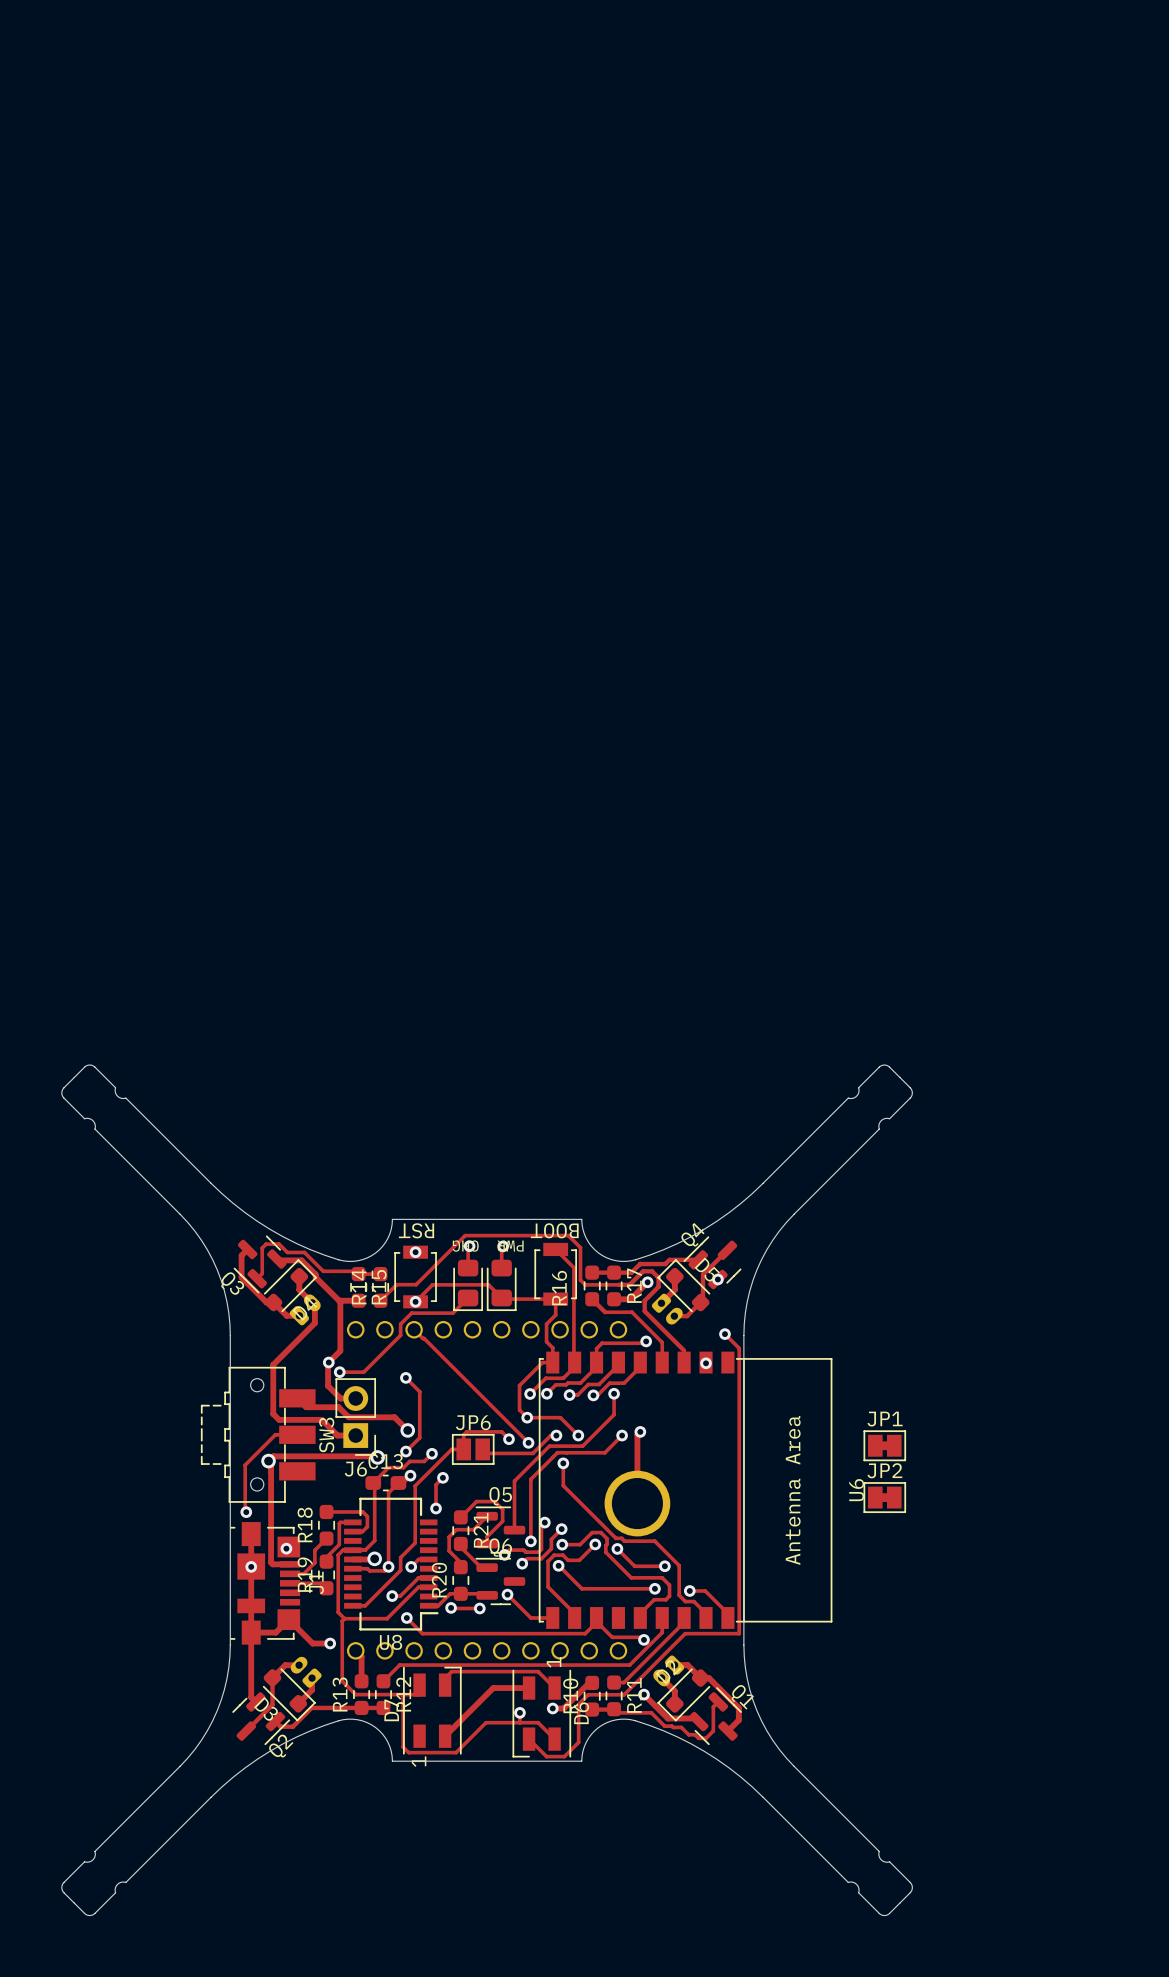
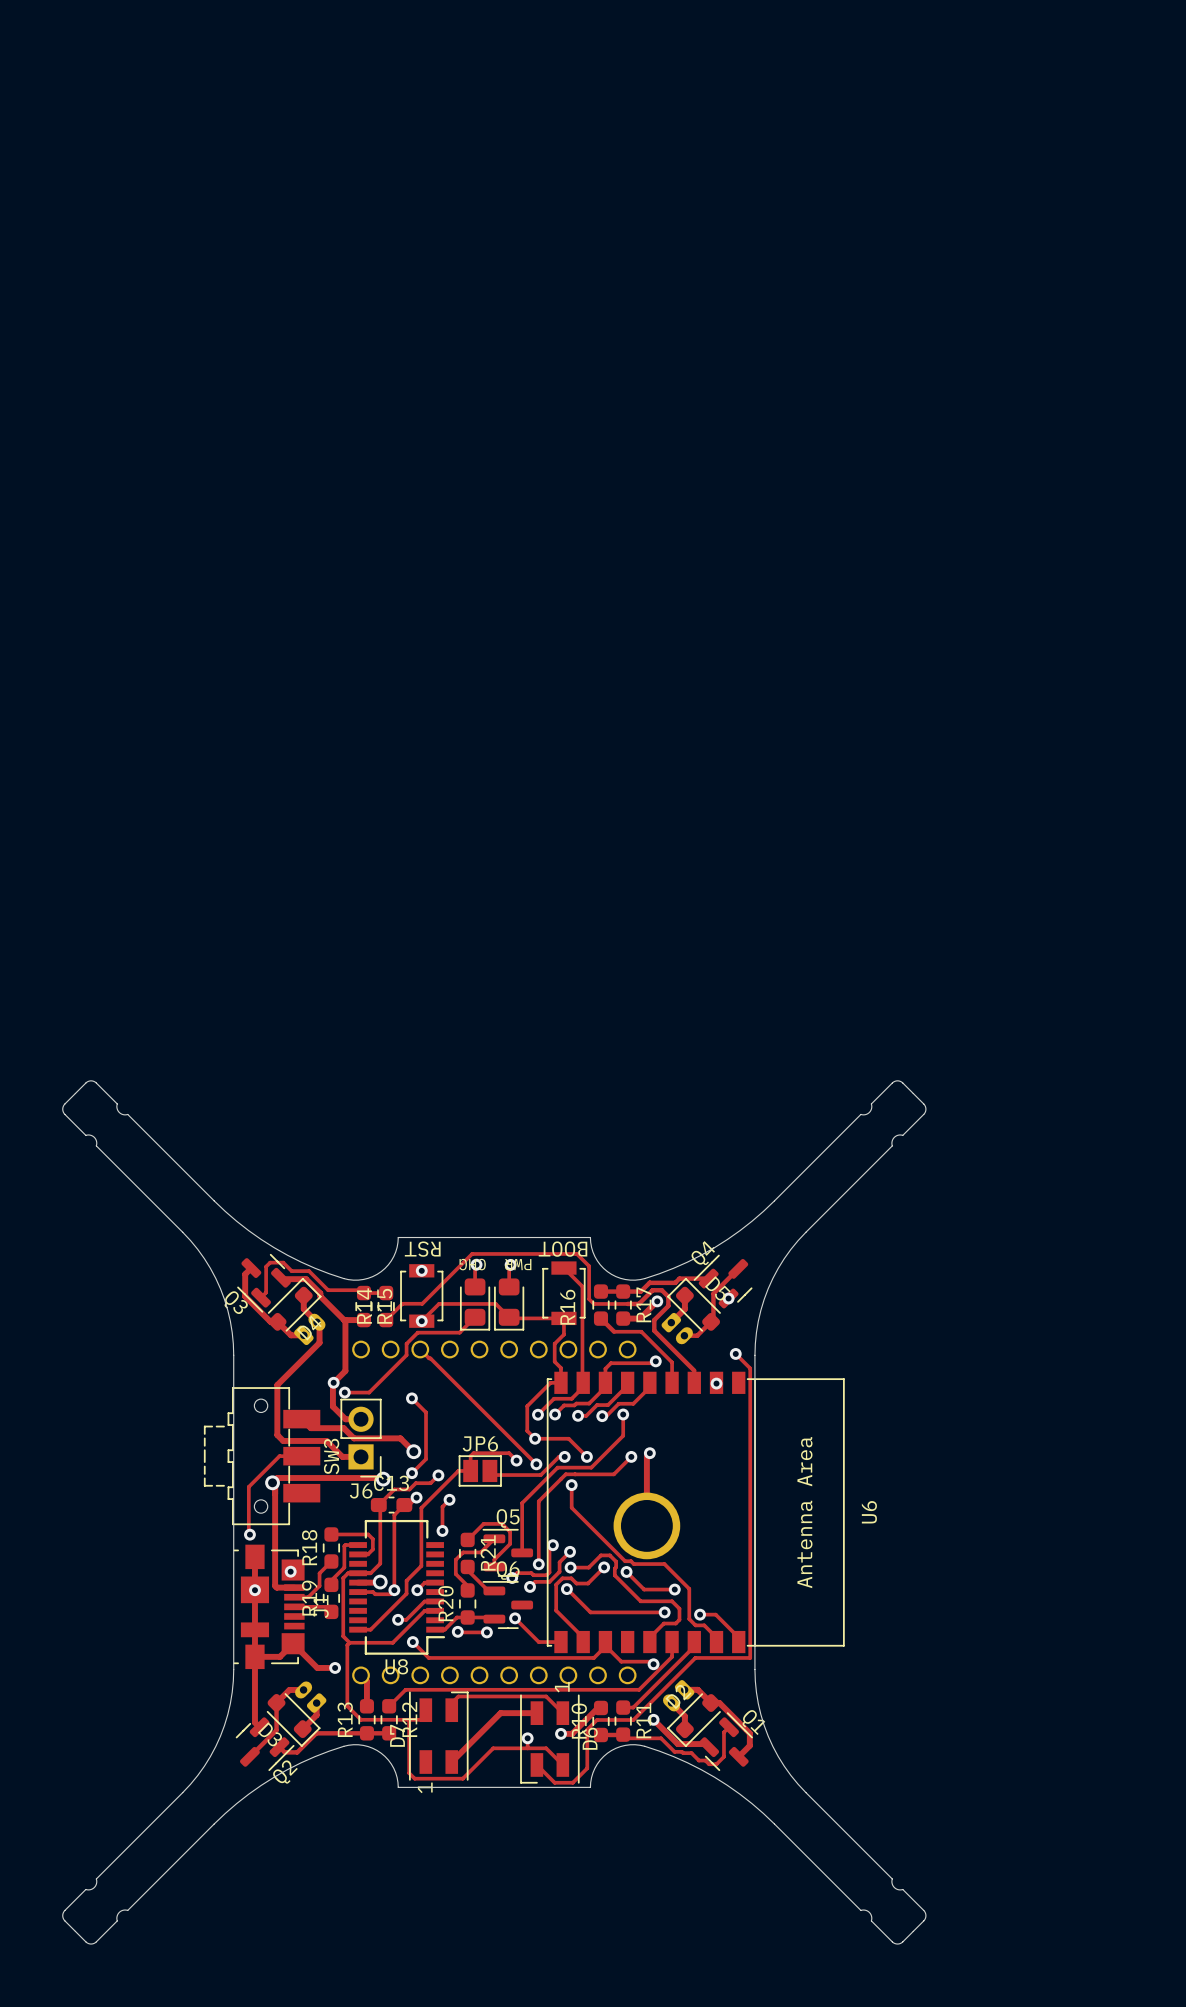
JP1: (884, 1445) -> none
JP2: (884, 1497) -> none

